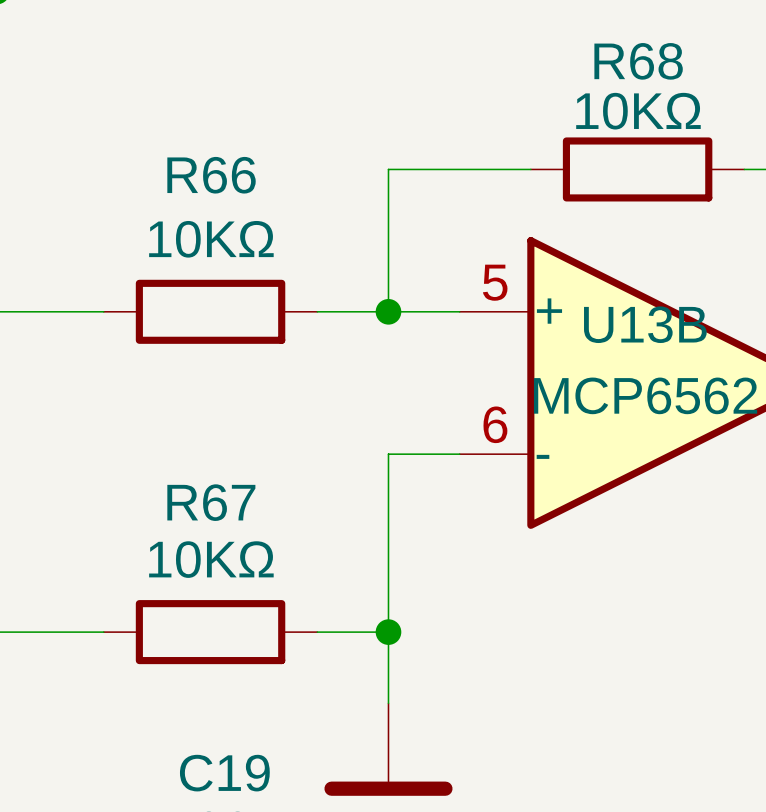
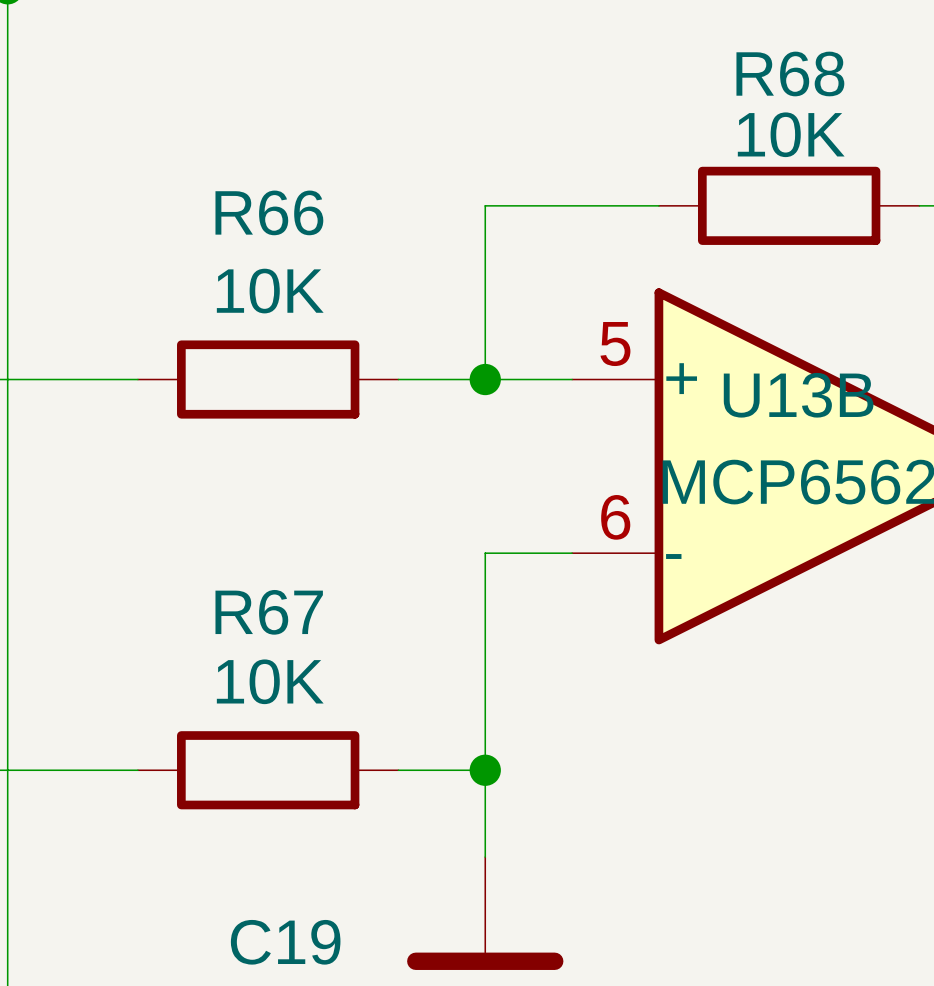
R68 value: 10KΩ (638, 111) -> 10K (791, 134)
R66 value: 10KΩ (211, 239) -> 10K (270, 291)
R67 value: 10KΩ (211, 559) -> 10K (270, 681)

